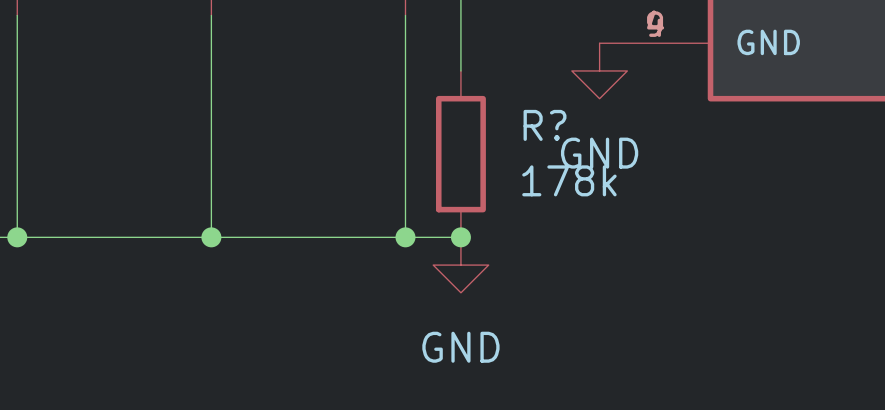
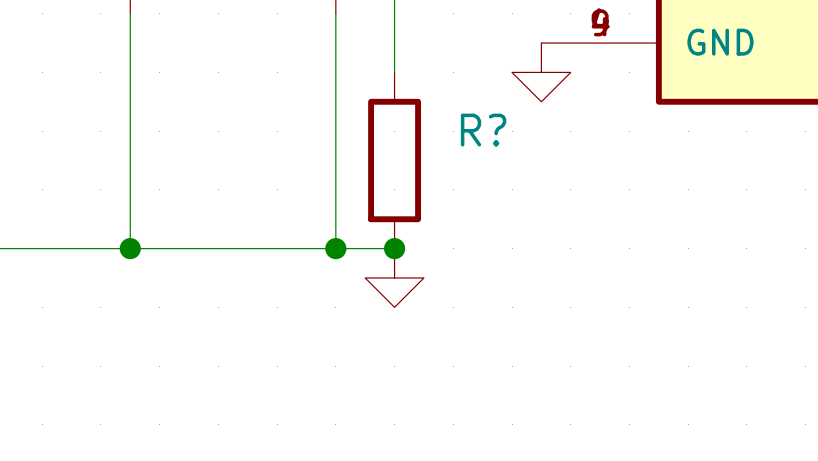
power symbol text: GND (599, 153) -> none
R? value: 178k (569, 180) -> none
power symbol text: GND (460, 347) -> none

